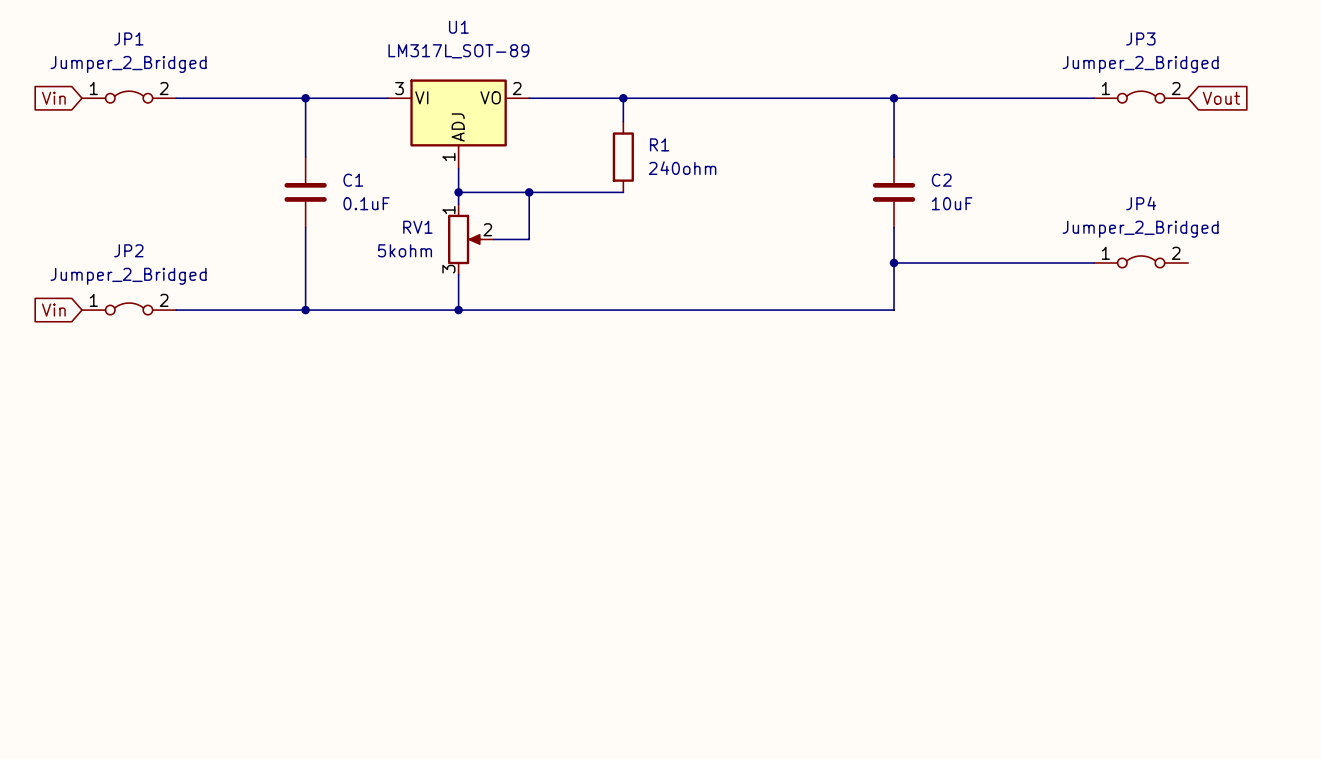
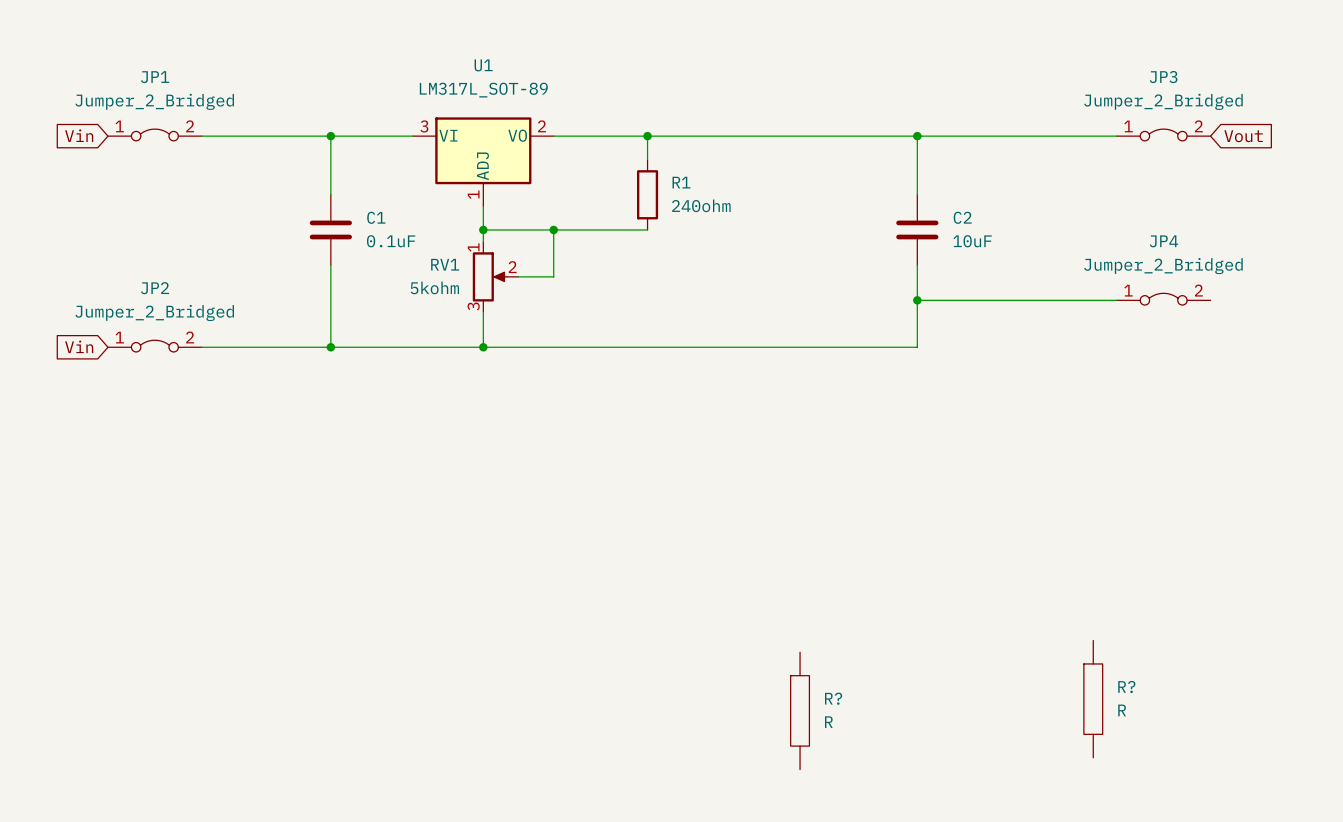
R?: none -> R (1093, 699)
R?: none -> R (800, 710)

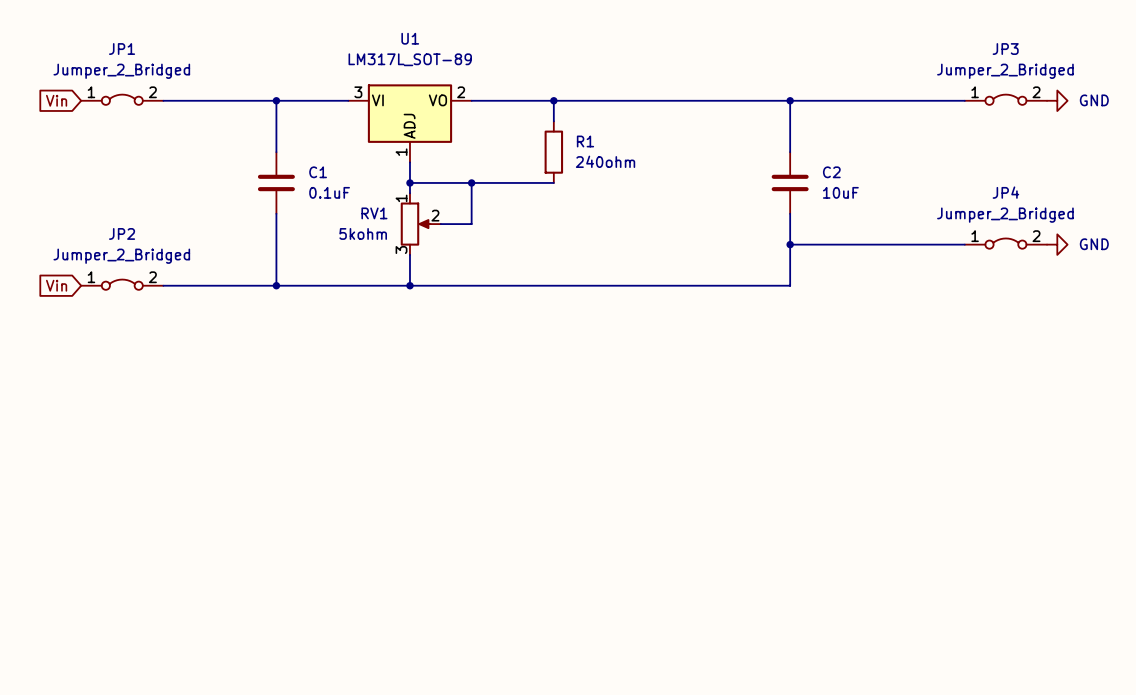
power symbol: none -> GND (1057, 100)
global label: Vout (1243, 136) -> none
power symbol: none -> GND (1057, 244)
R?: R (1093, 699) -> none
R?: R (800, 710) -> none

